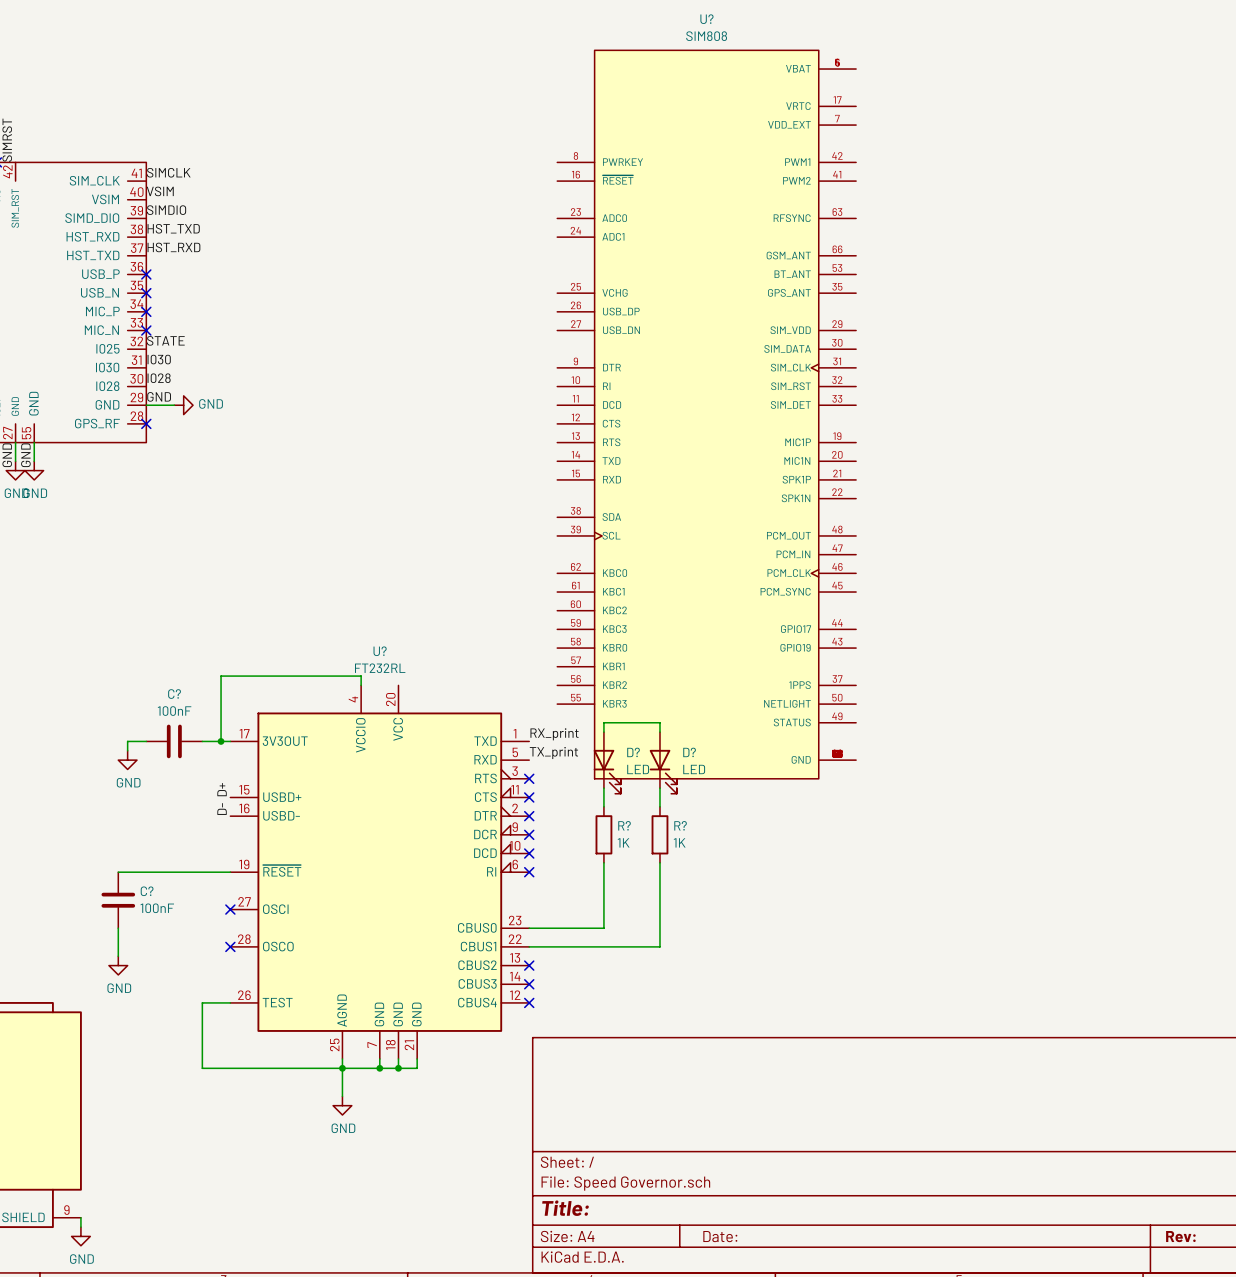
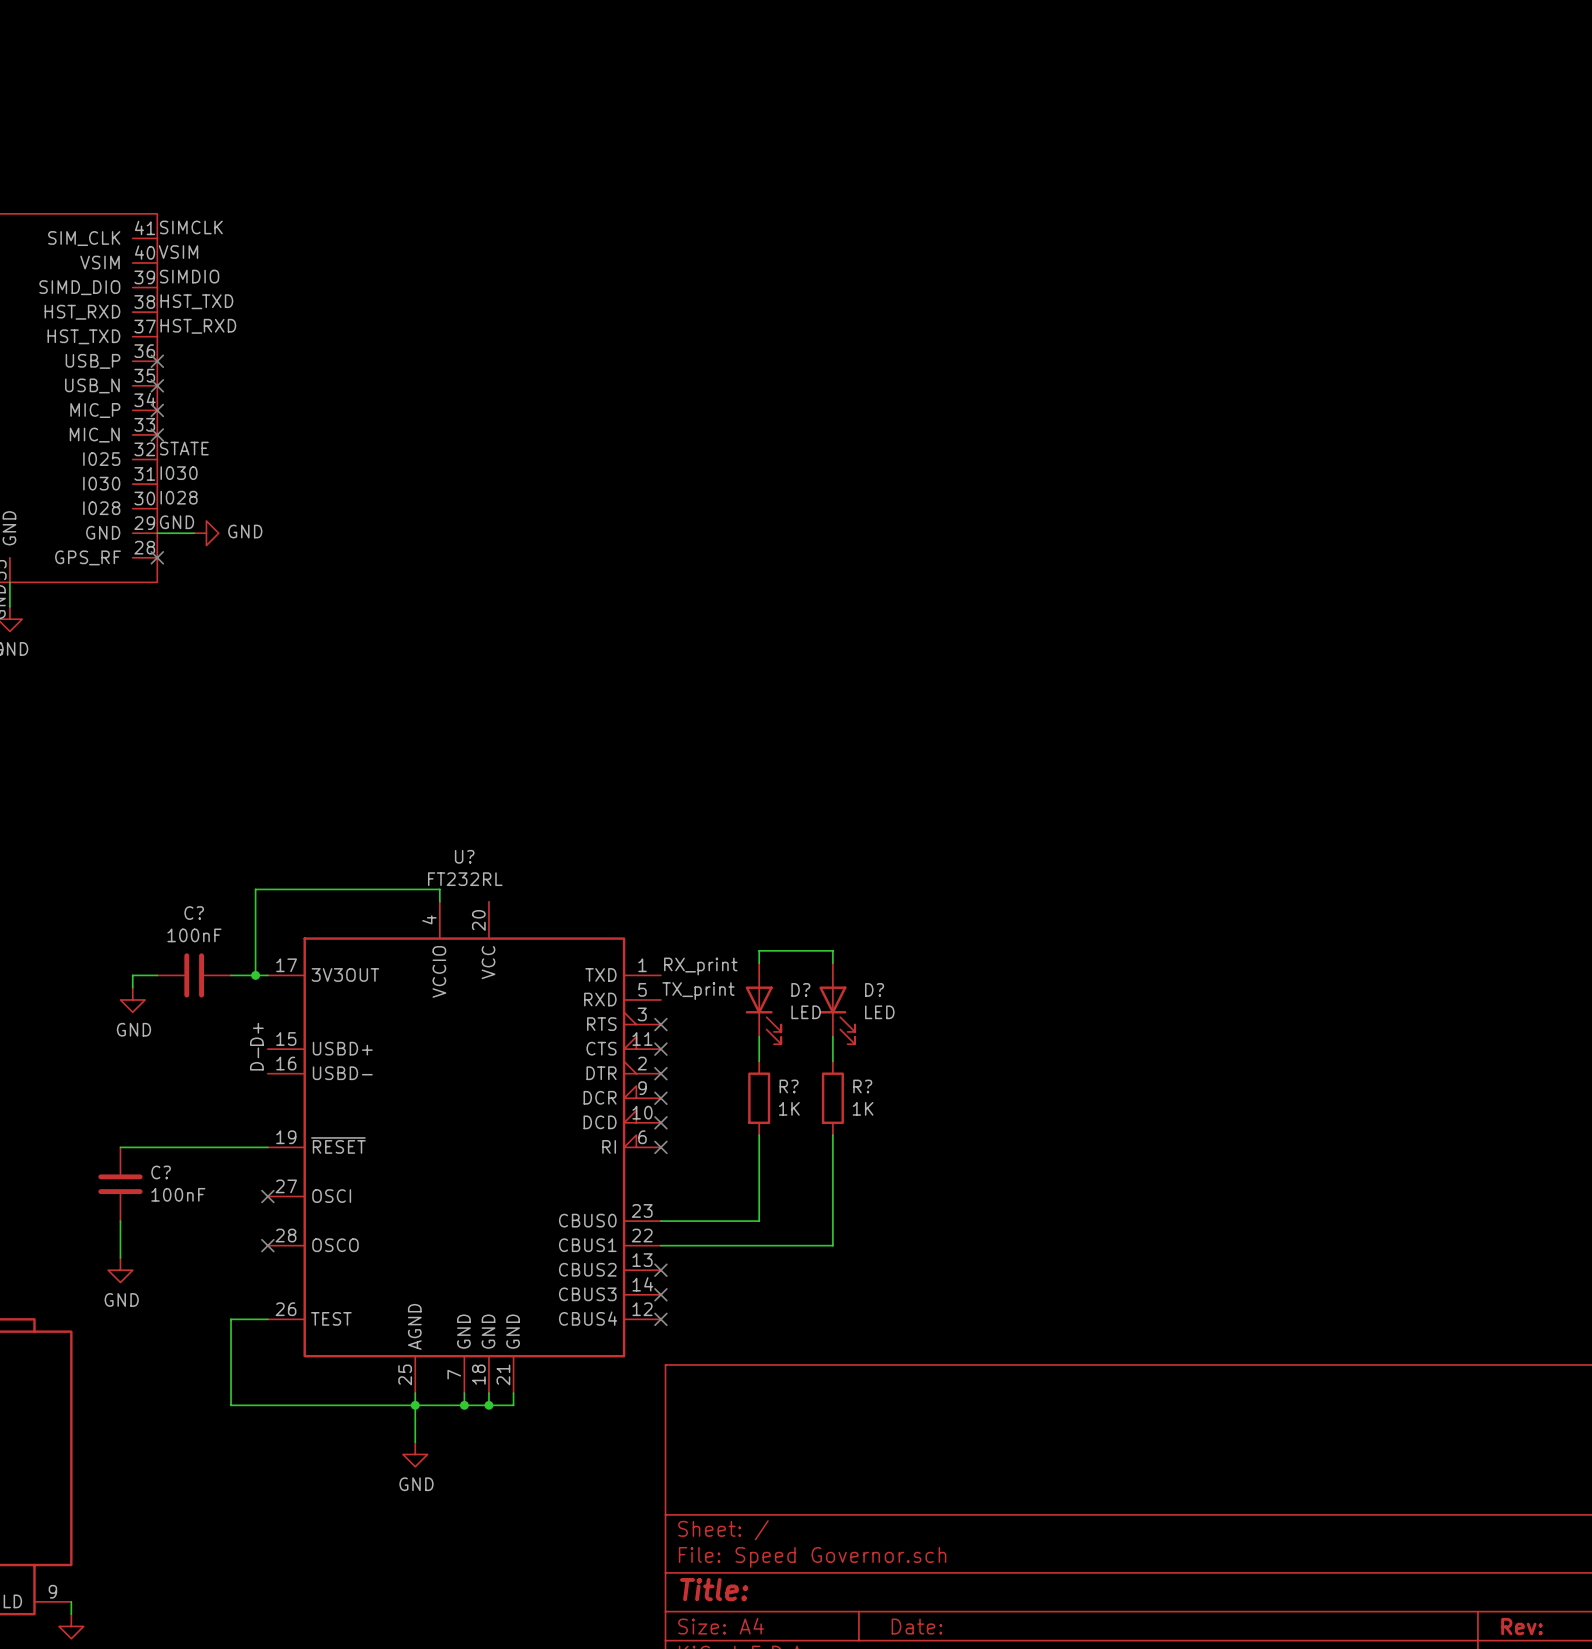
U?: SIM808 (706, 414) -> none

